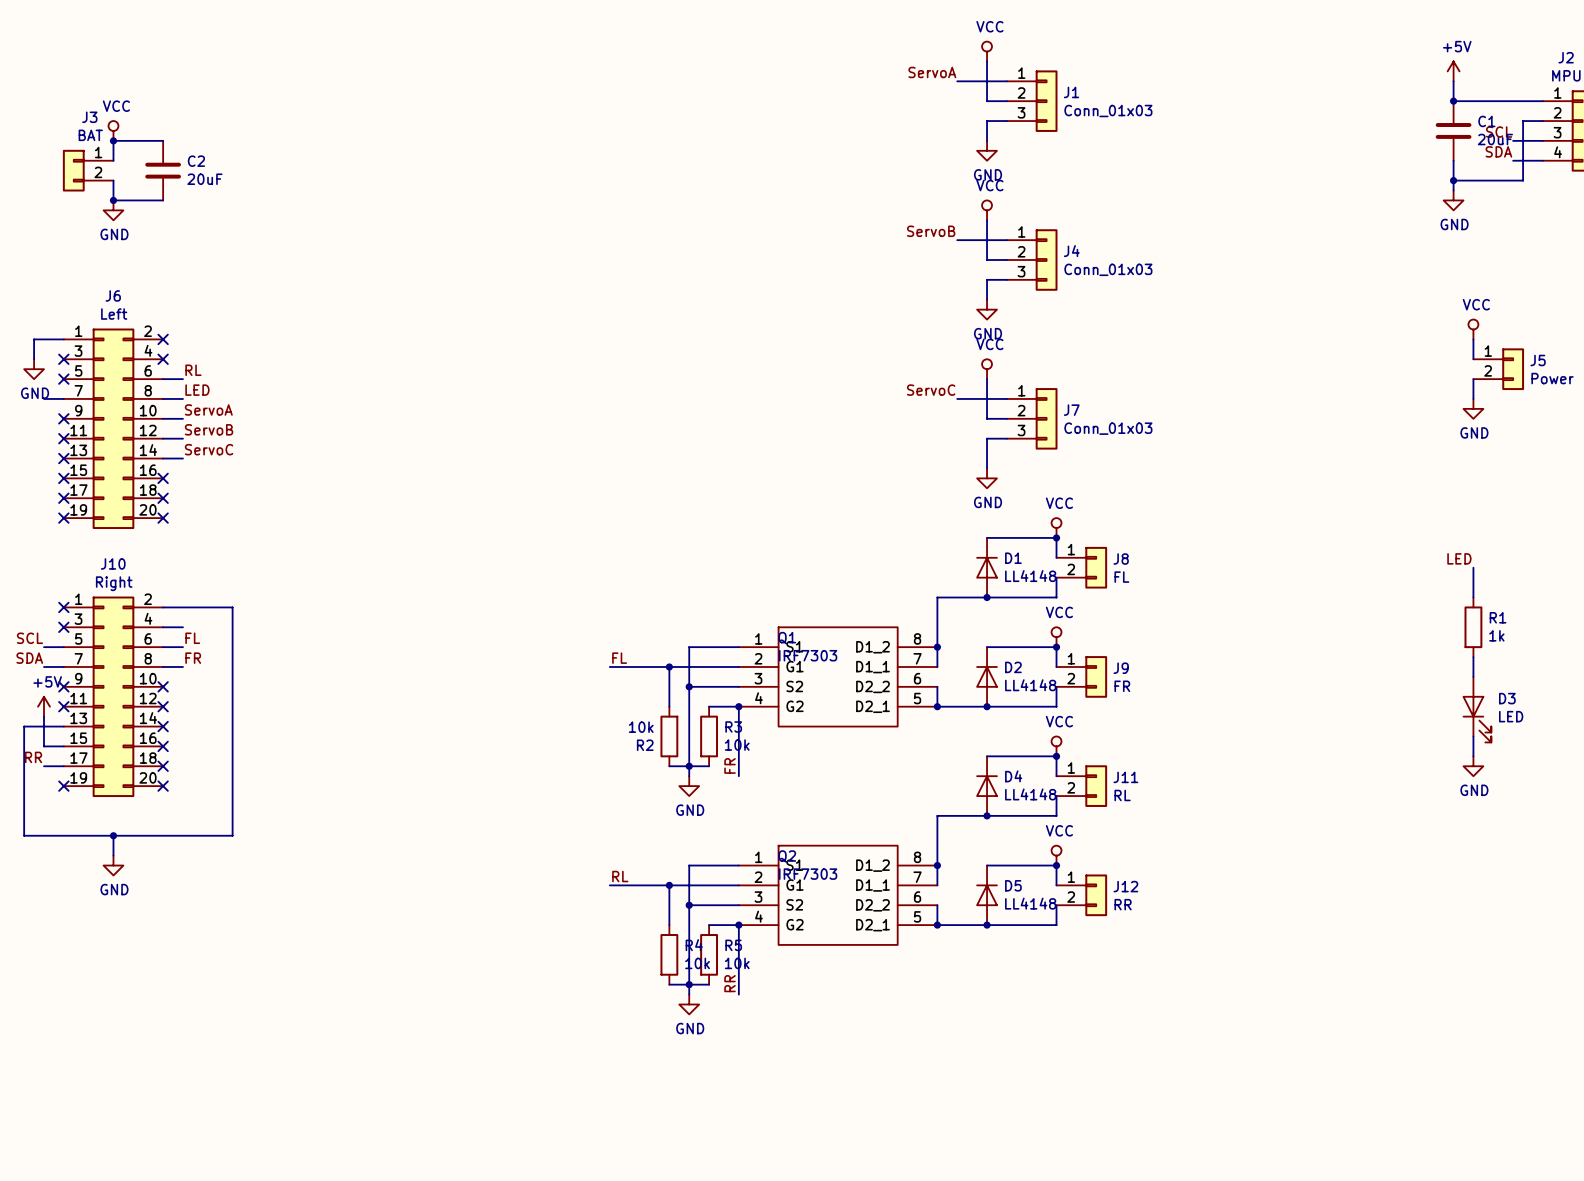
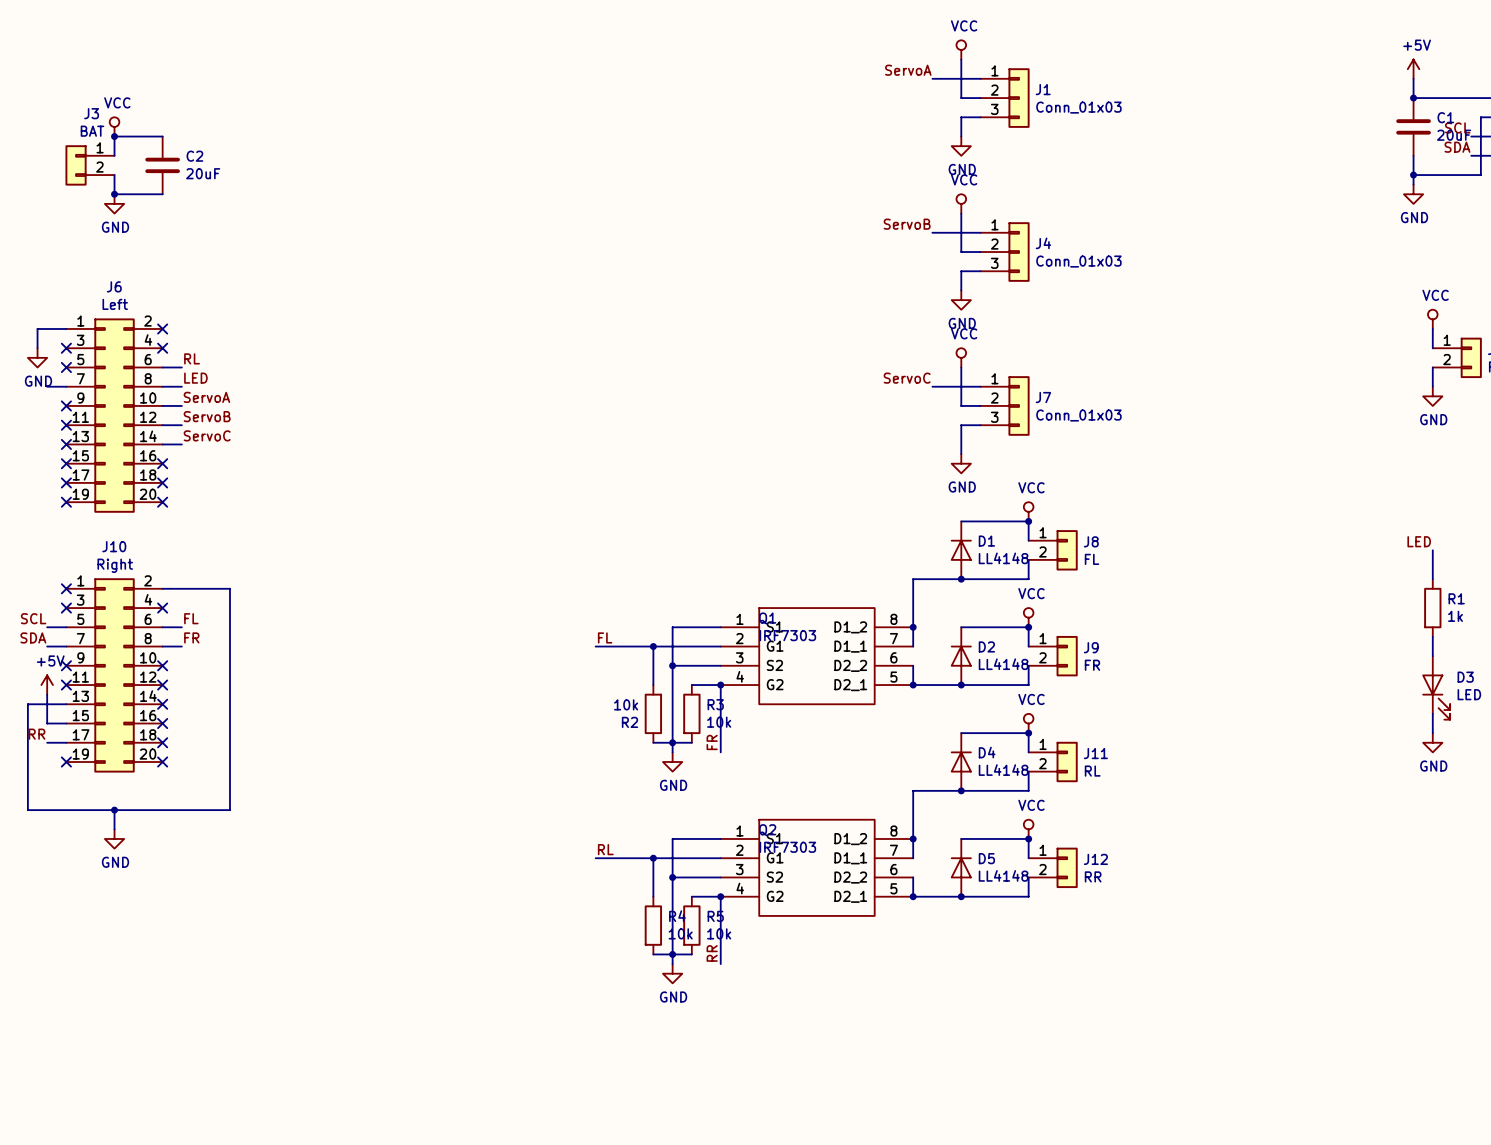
wire: (163, 627) (182, 627) -> none
no-connect mark: none -> (162, 608)

